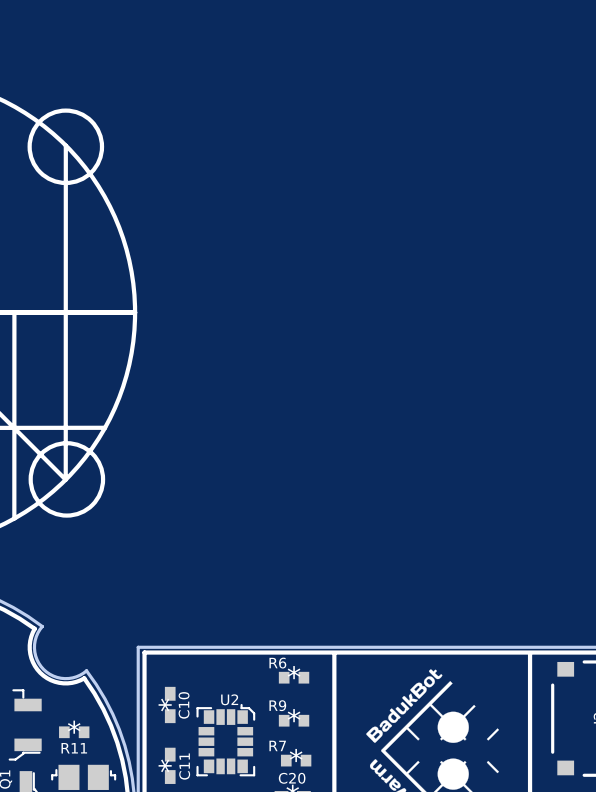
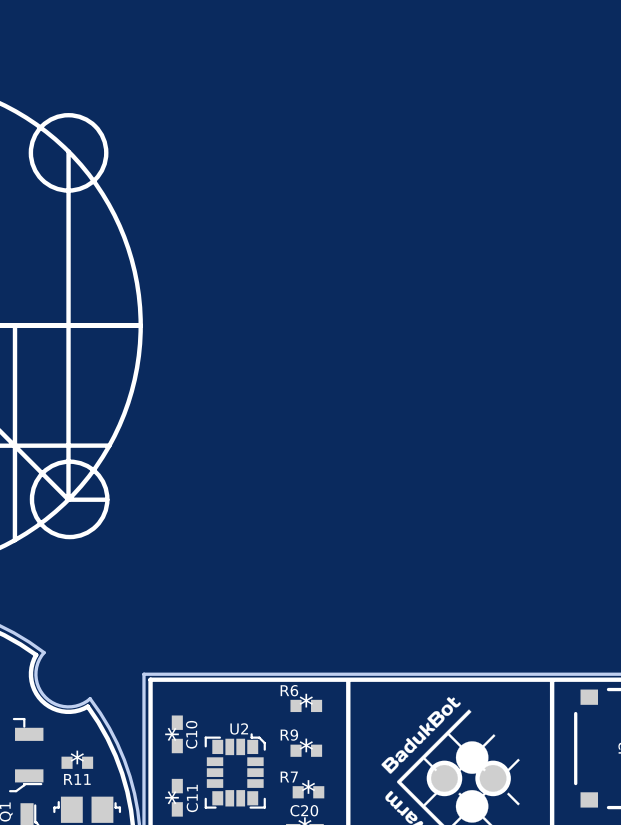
line: none -> (68, 499) (107, 499)
part: none -> (444, 778)
part: none -> (493, 778)

